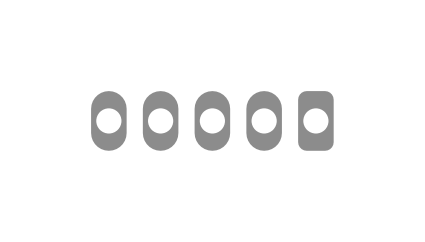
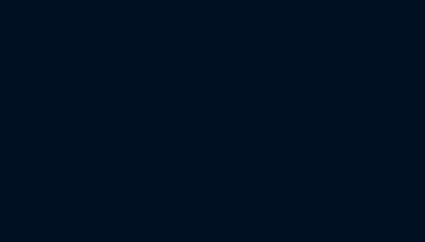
part: (212, 120) -> none

